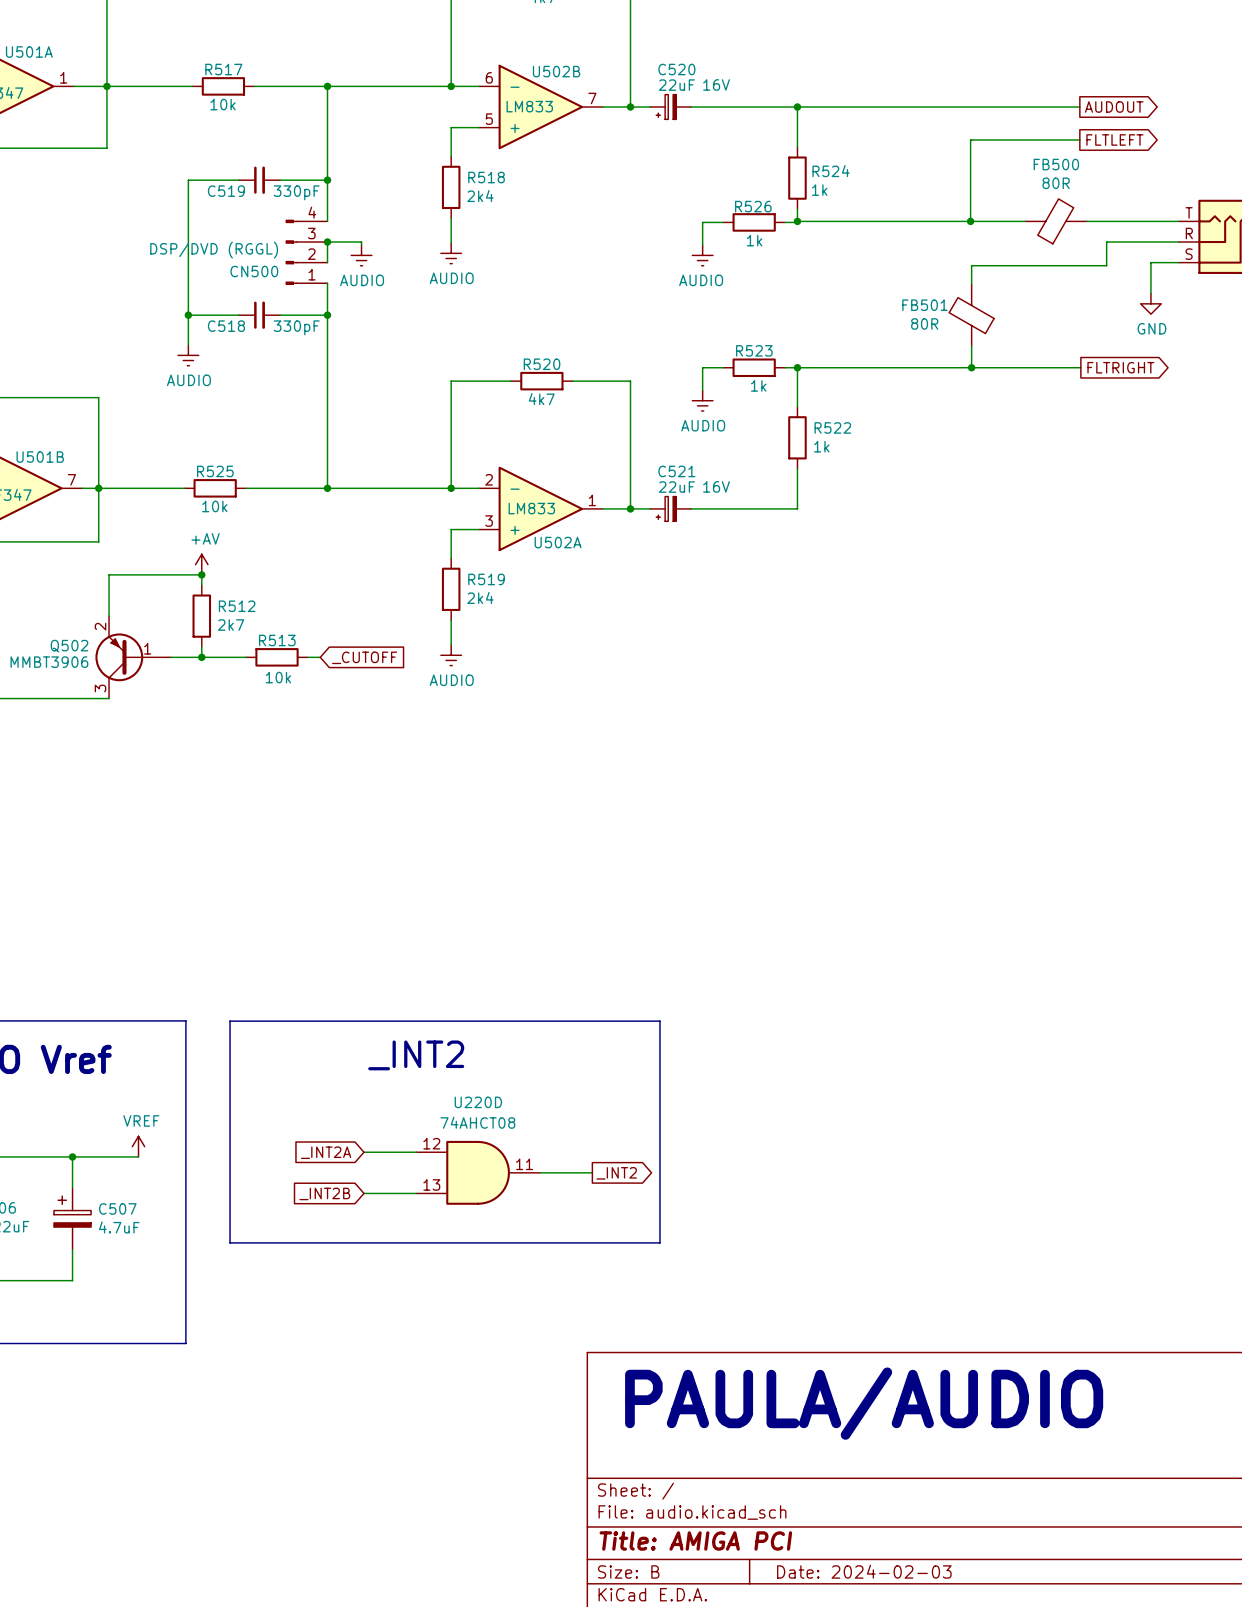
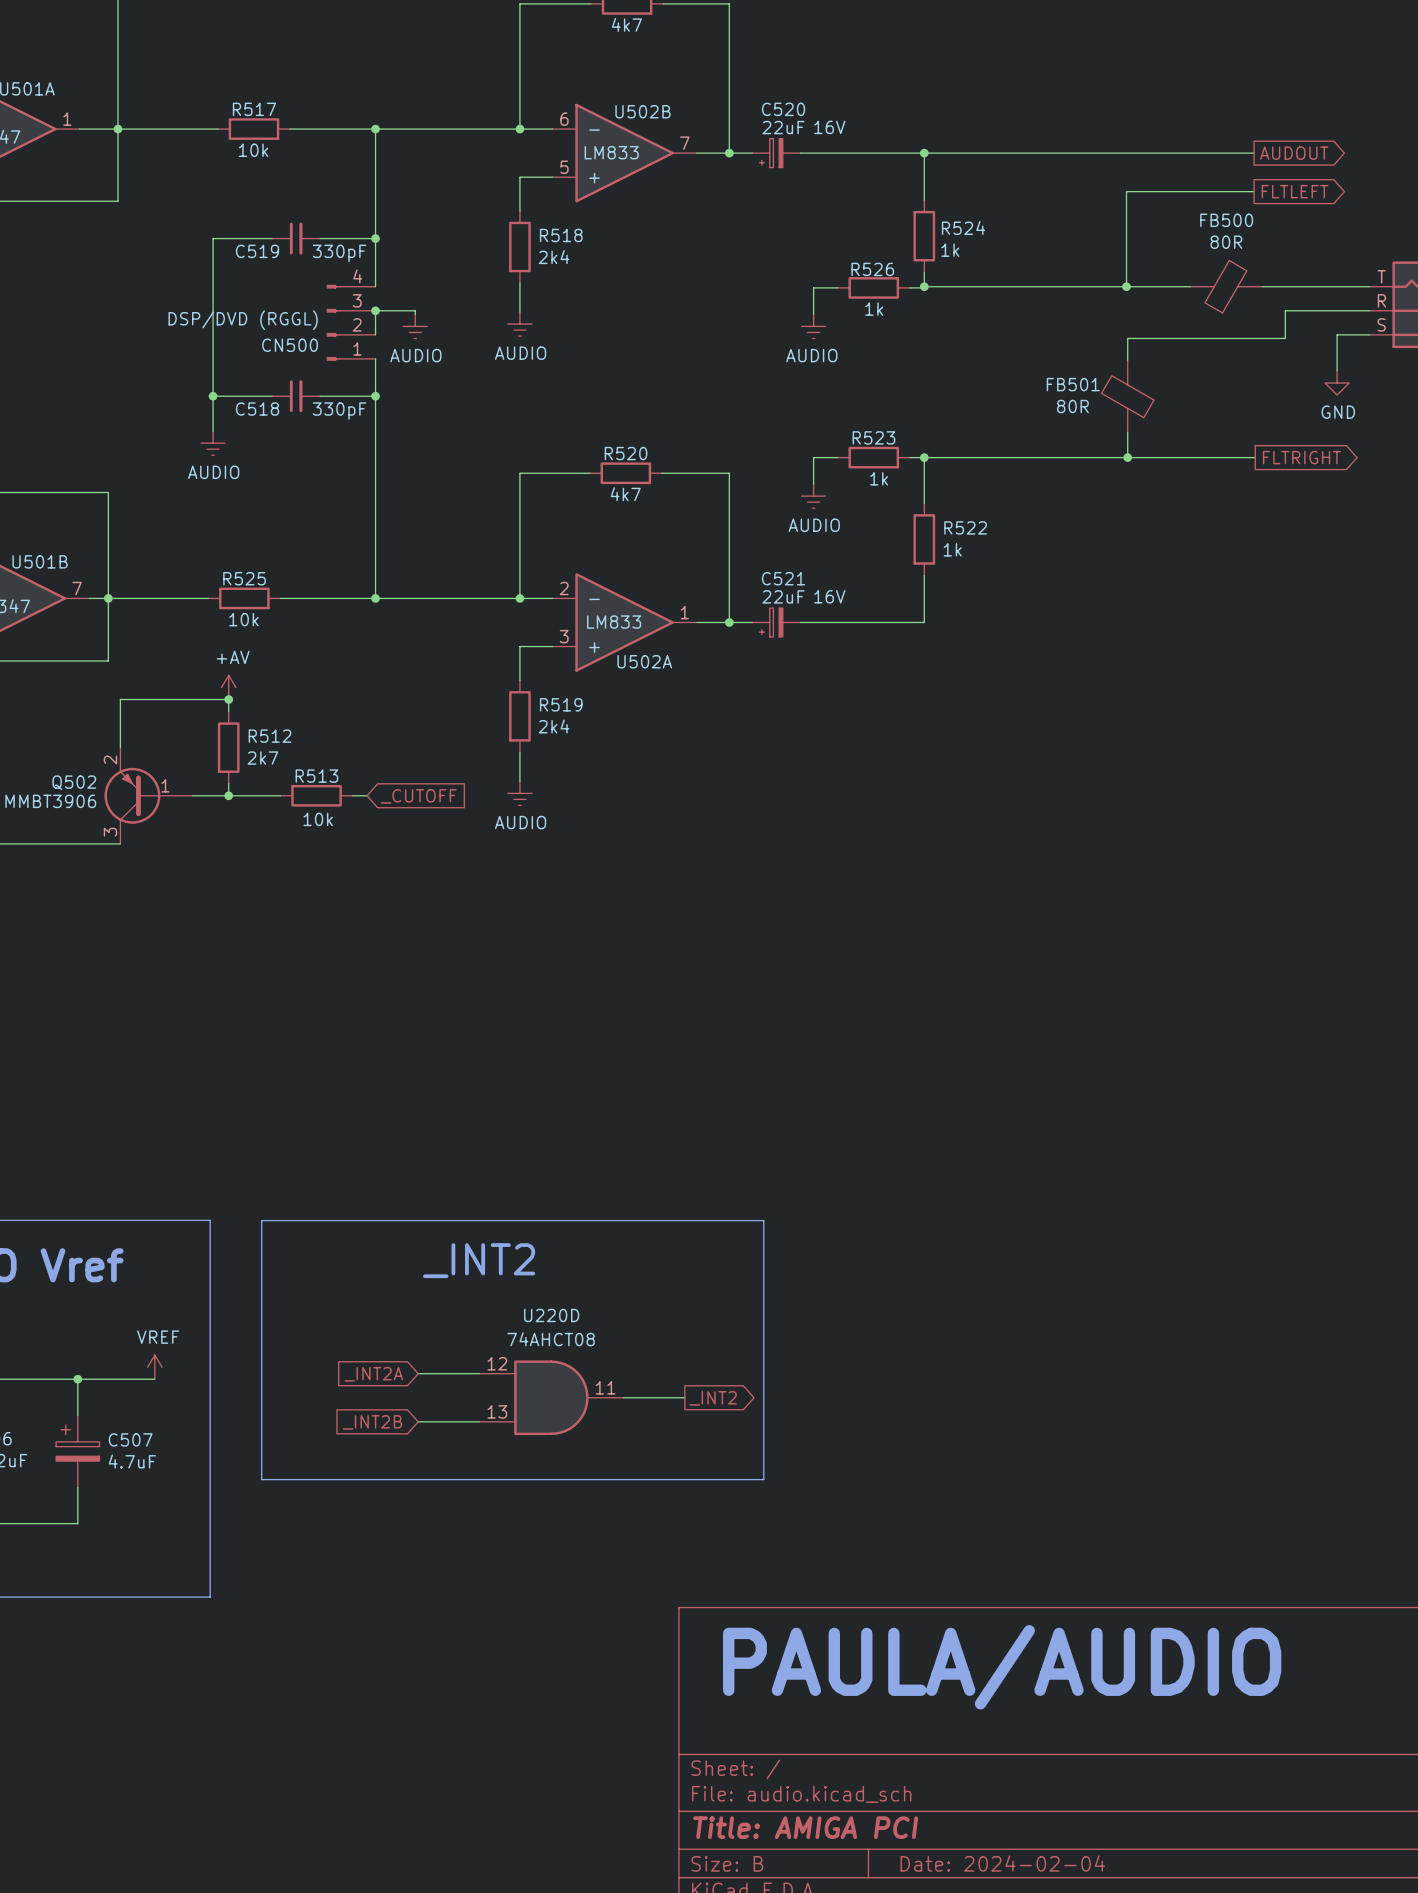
title block: Date: 2024-02-03 (864, 1571) -> Date: 2024-02-04 (1002, 1863)

